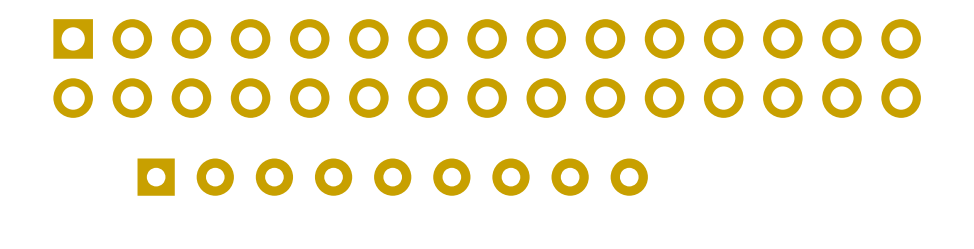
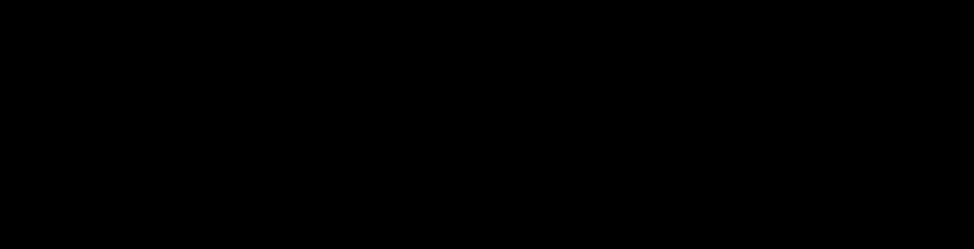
part: (487, 68) -> none
part: (392, 177) -> none

